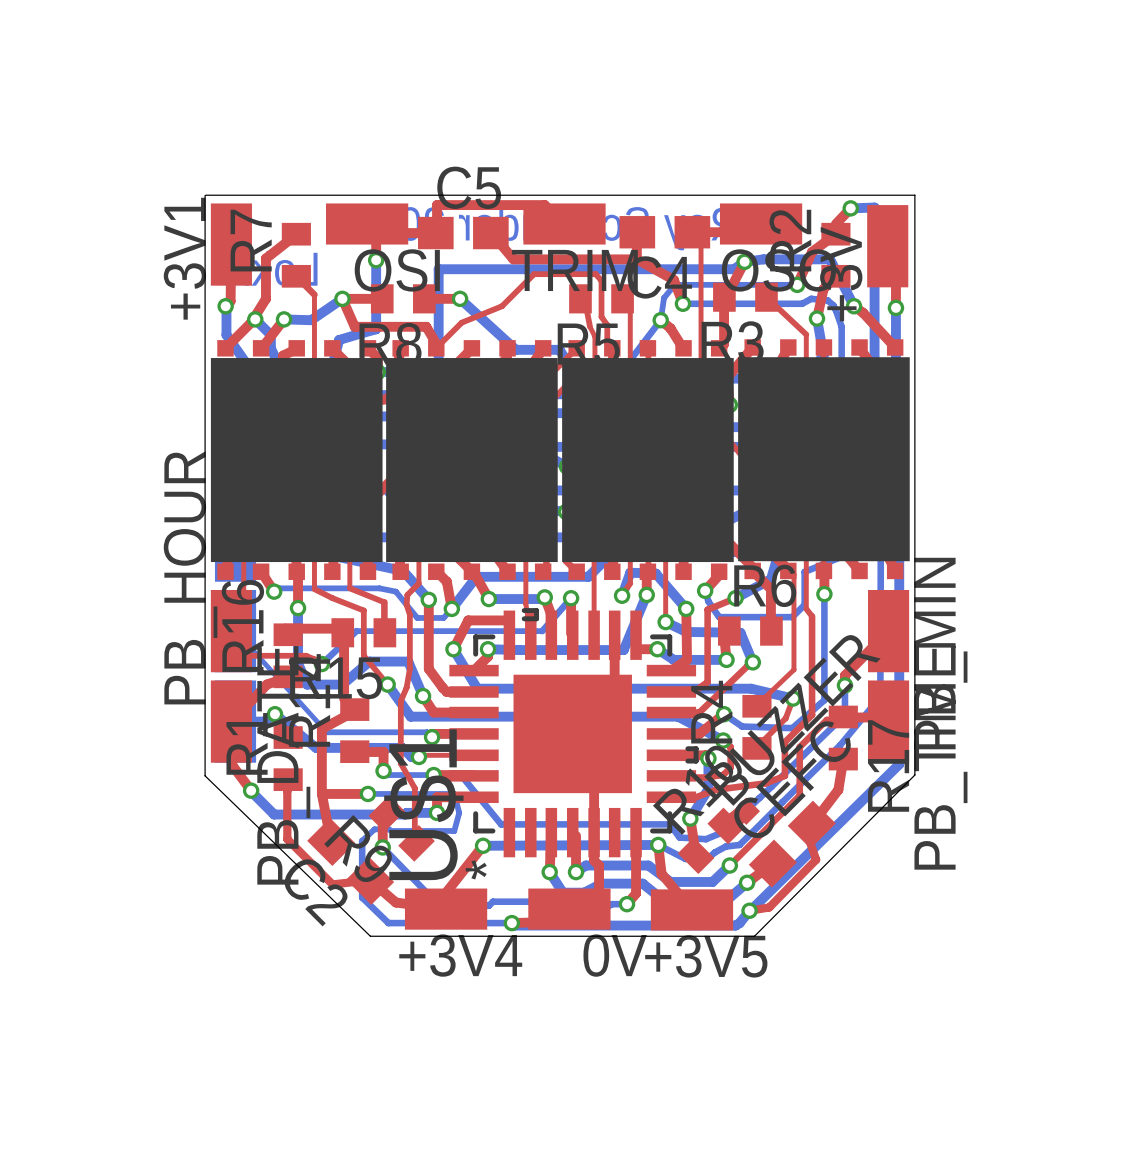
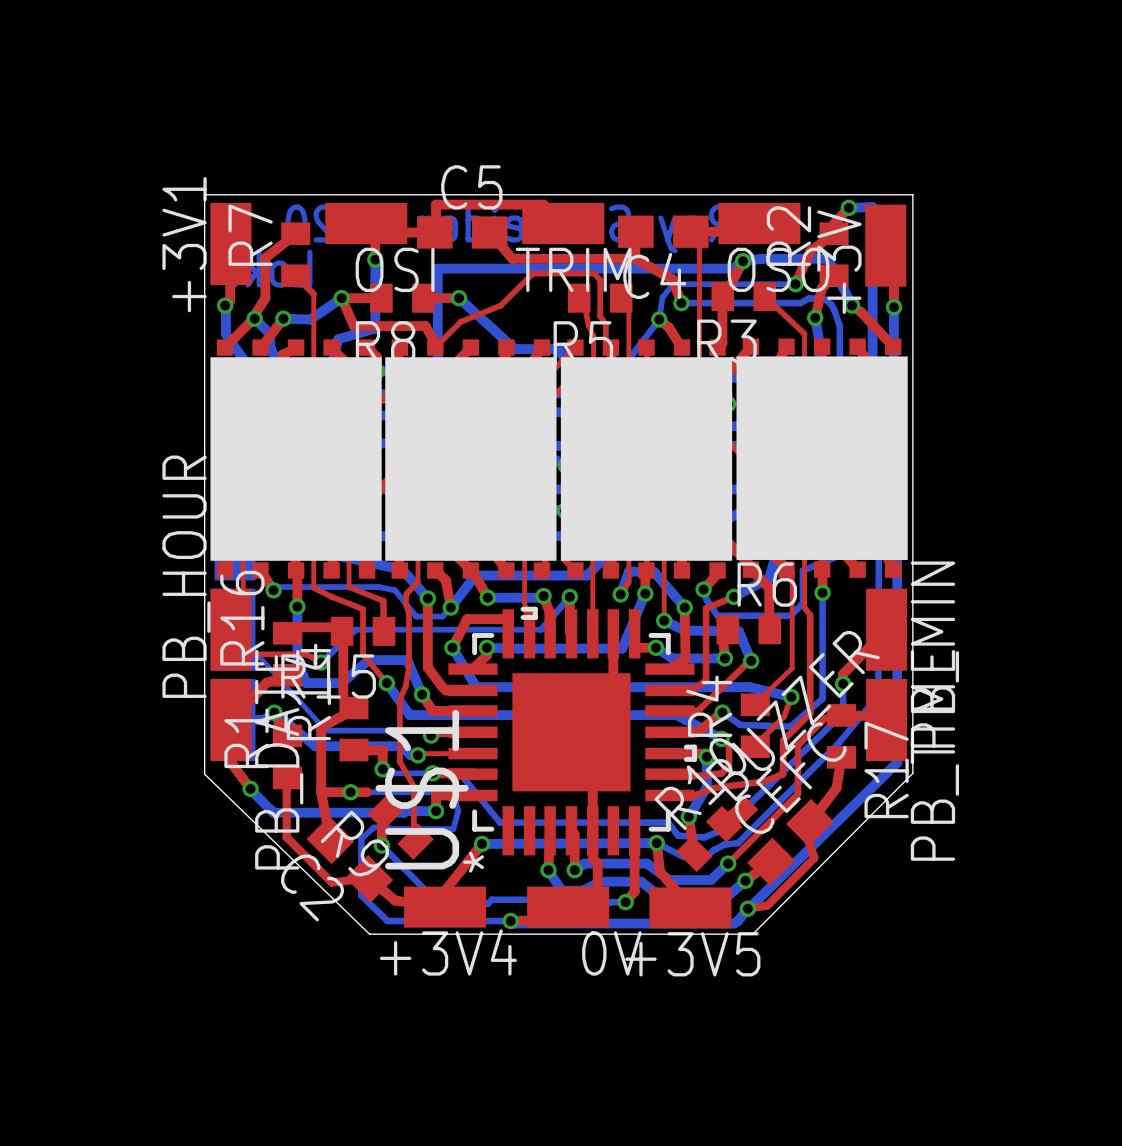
via position: (367, 793) -> (350, 792)

